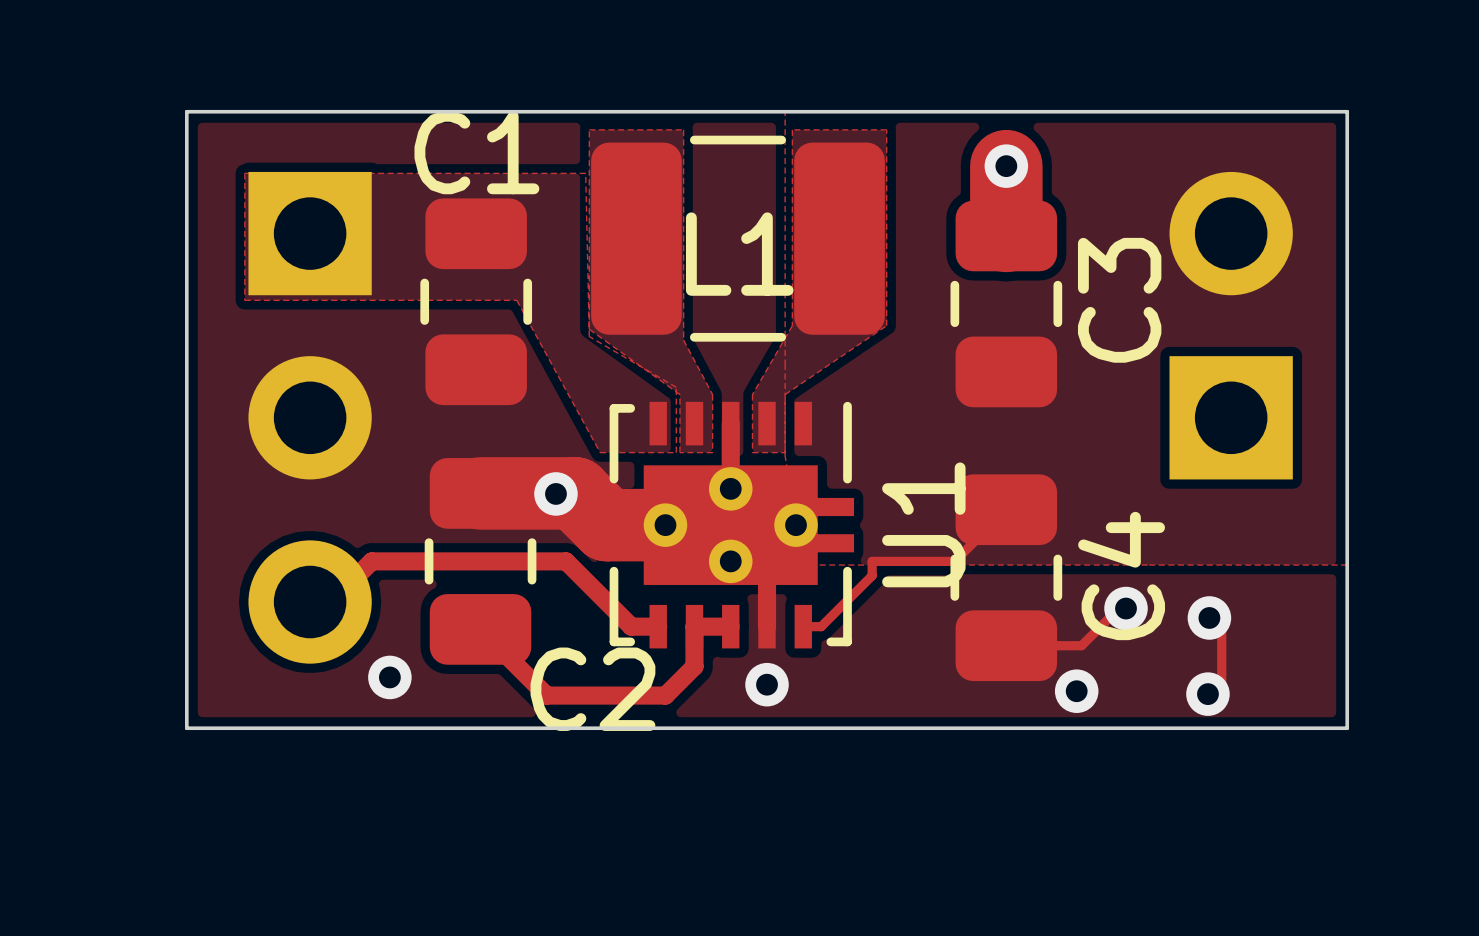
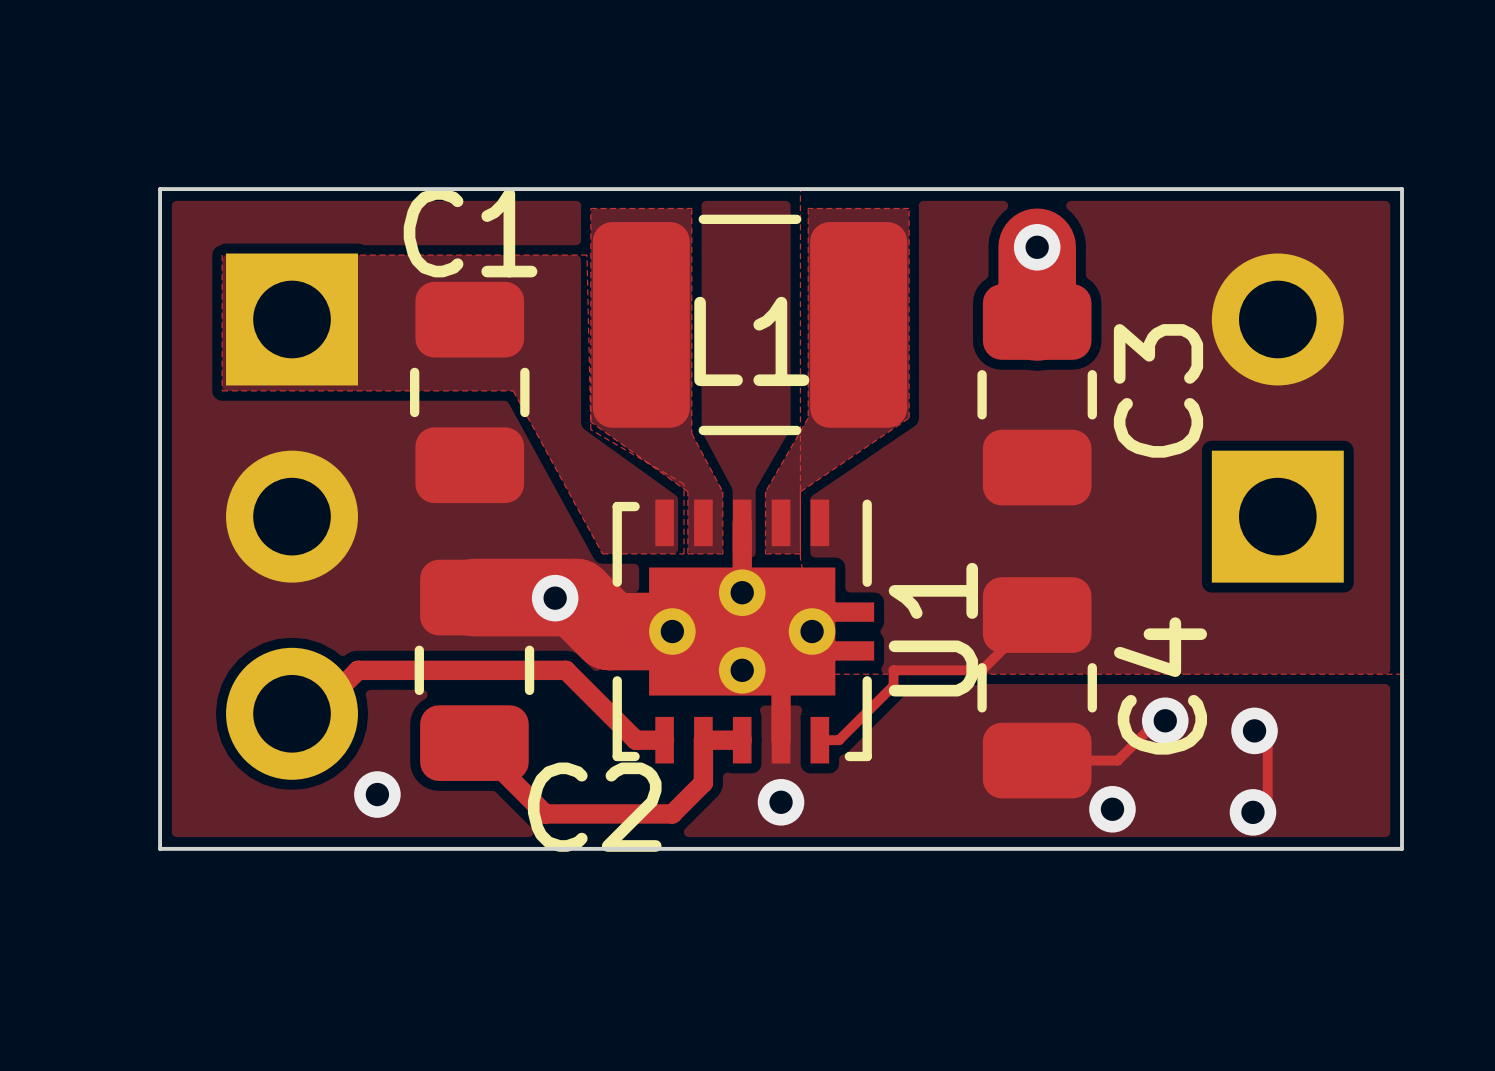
U1 name position: U1 (923, 524) -> U1 (933, 629)

